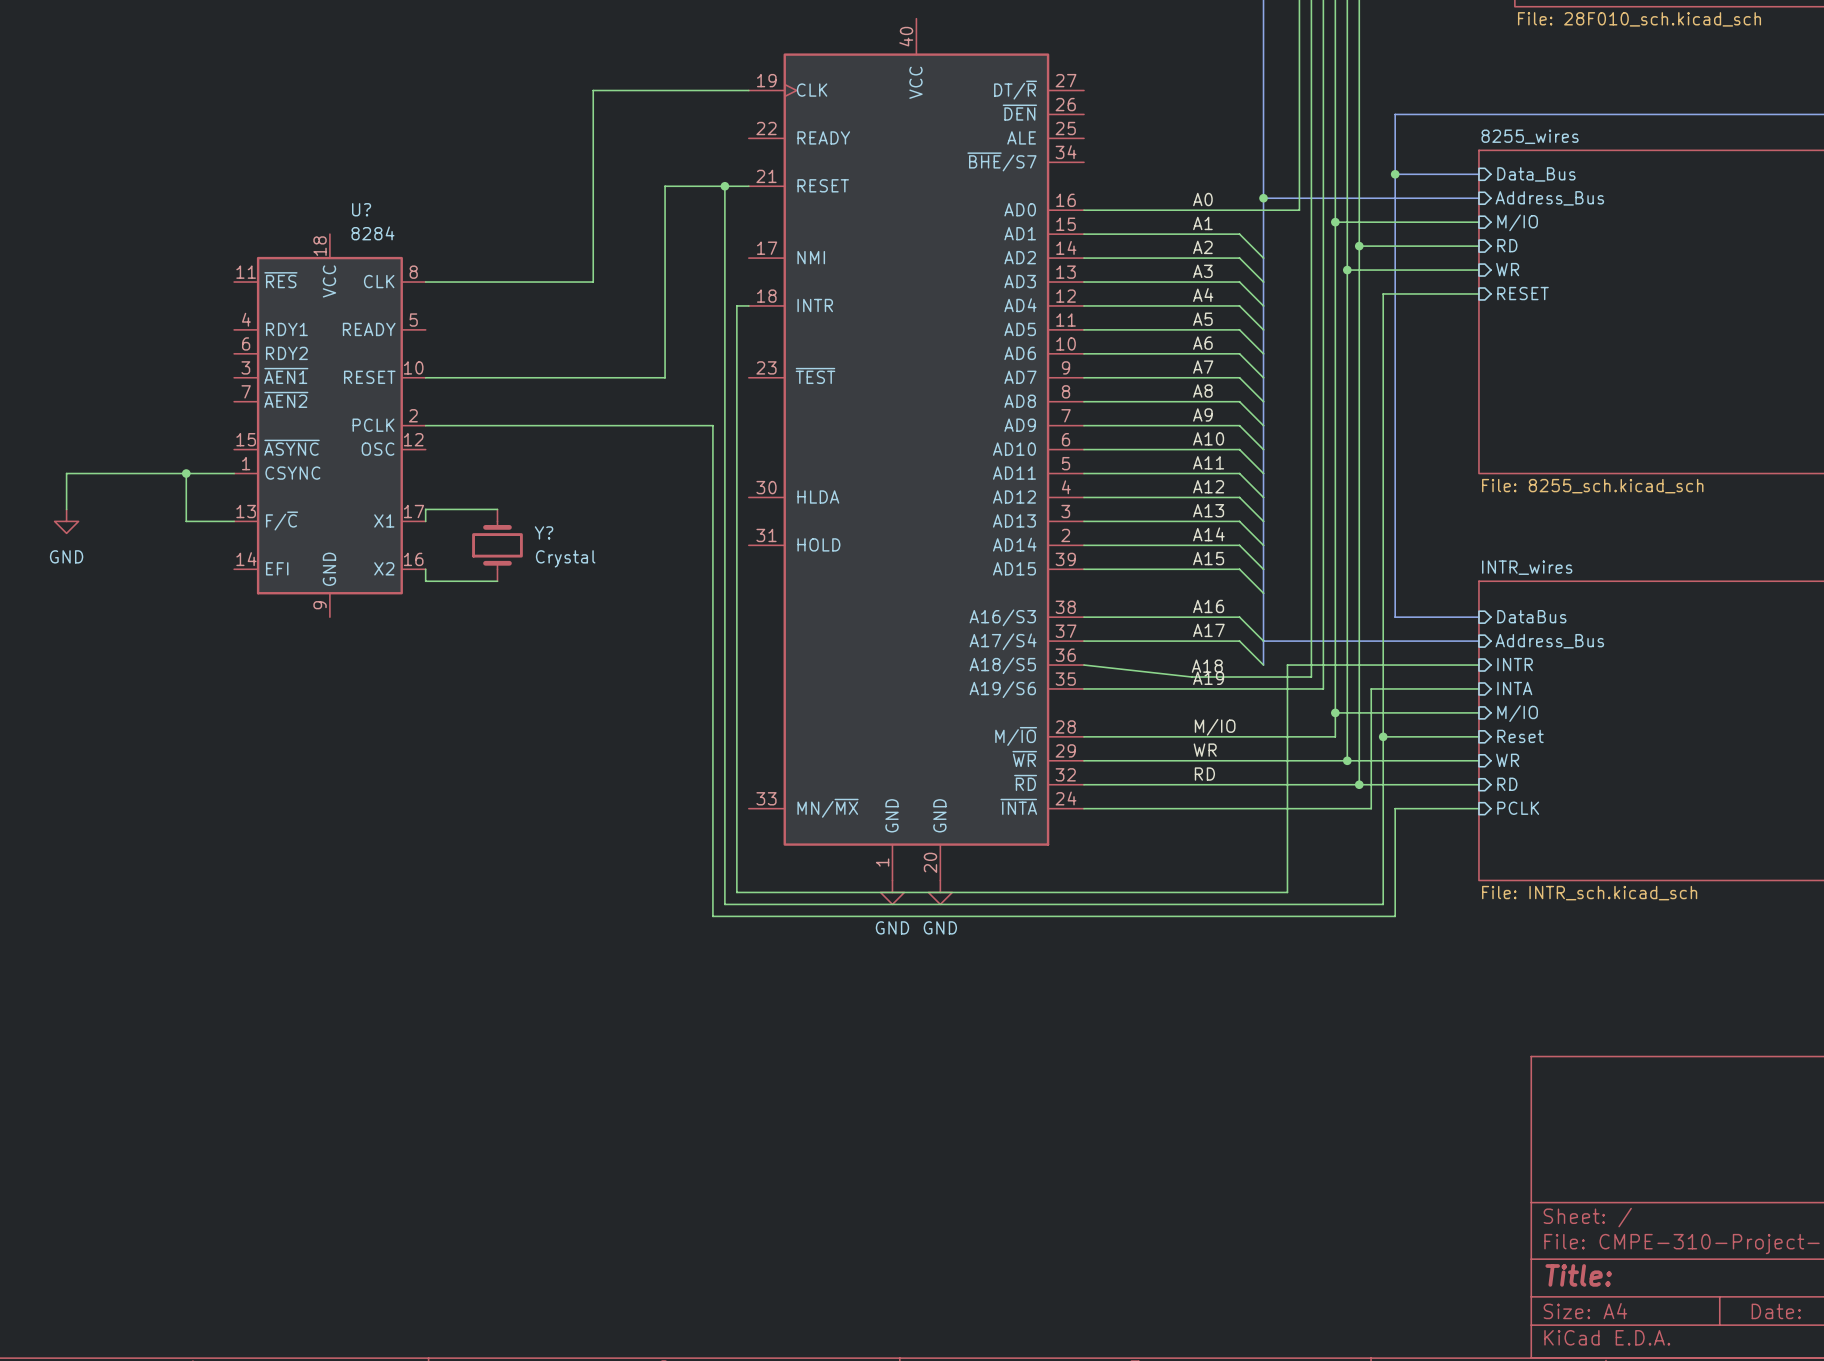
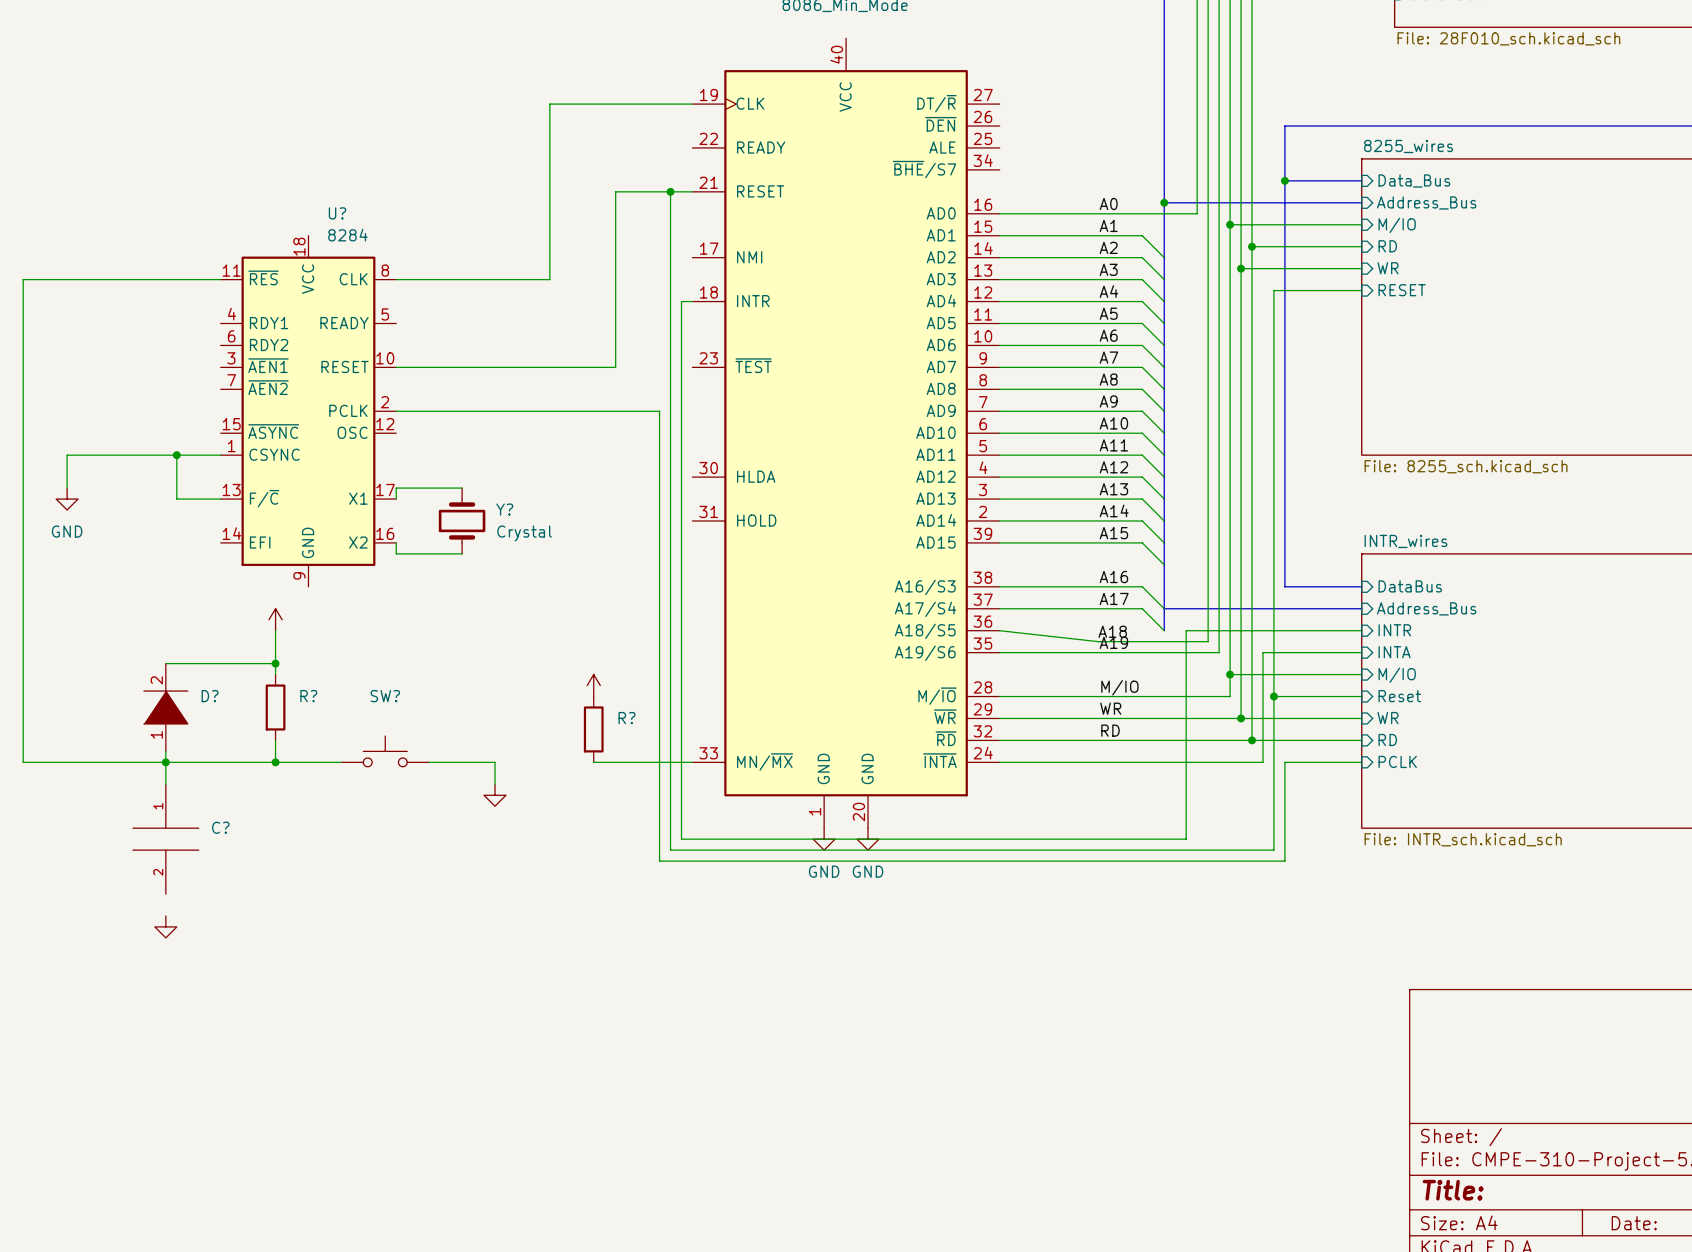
wire: none -> (220, 279) (23, 279) (23, 762) (341, 762)
power symbol: none -> (275, 619)
wire: none -> (275, 630) (275, 674)
wire: none -> (165, 663) (275, 663)
junction: none -> (275, 663)
power symbol: none -> (593, 685)
D?: none -> (165, 707)
R?: none -> (275, 707)
R?: none -> (593, 729)
wire: none -> (275, 740) (275, 762)
wire: none -> (165, 751) (165, 784)
SW?: none -> (385, 751)
junction: none -> (165, 762)
junction: none -> (275, 762)
wire: none -> (429, 762) (494, 762) (494, 784)
wire: none -> (593, 762) (692, 762)
power symbol: none -> (494, 795)
C?: none -> (165, 839)
power symbol: none -> (165, 926)

